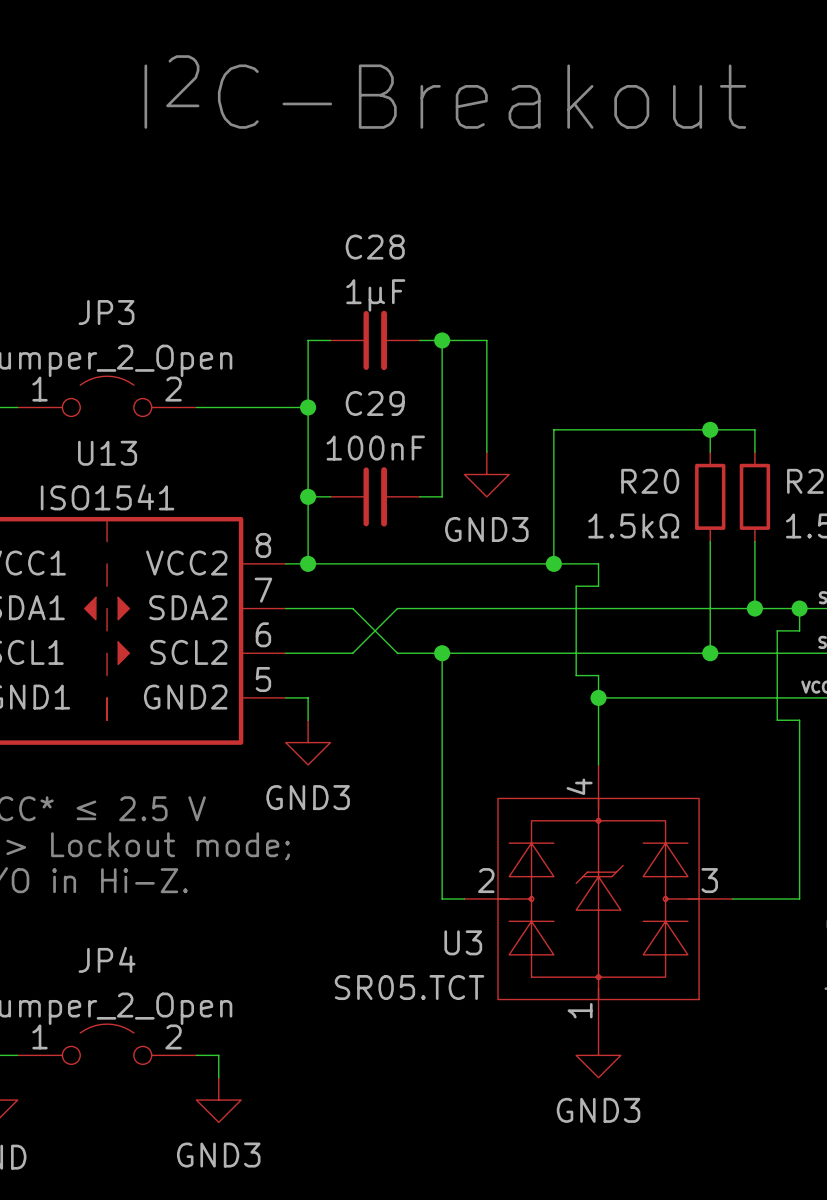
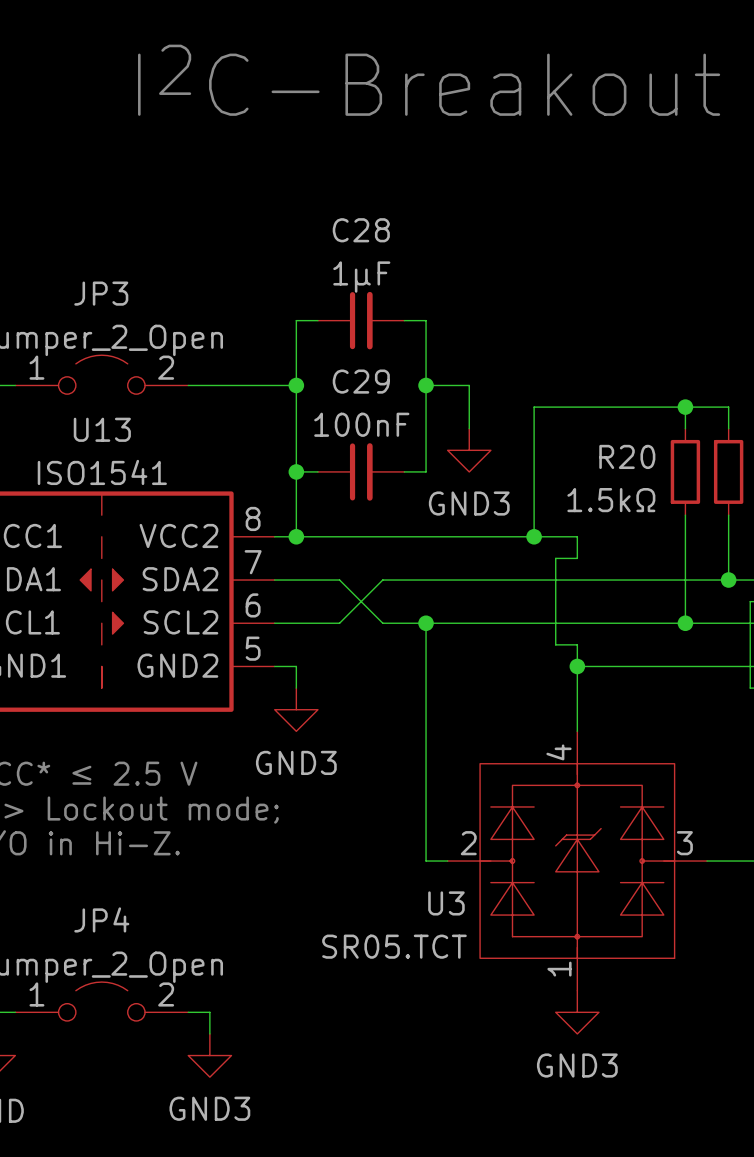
wire: (442, 340) (486, 340) (486, 407) -> (426, 385) (469, 385)
junction position: (442, 340) -> (426, 385)

